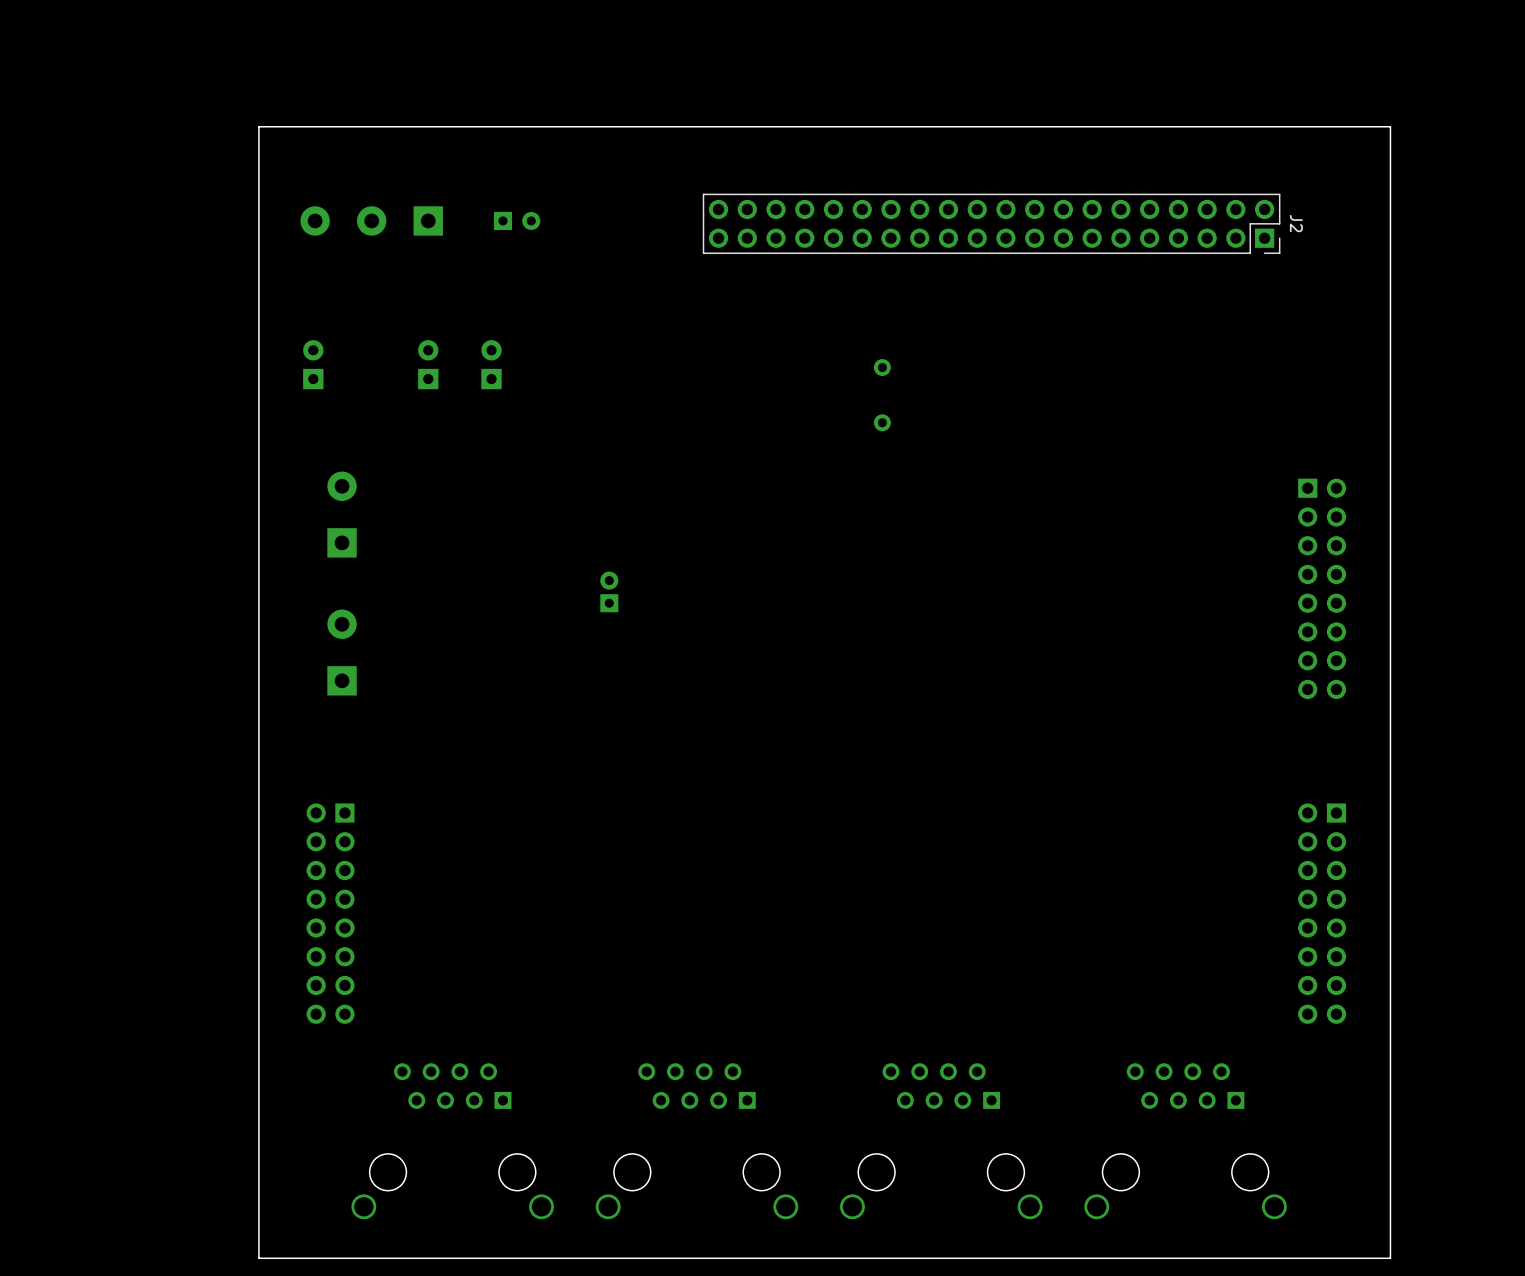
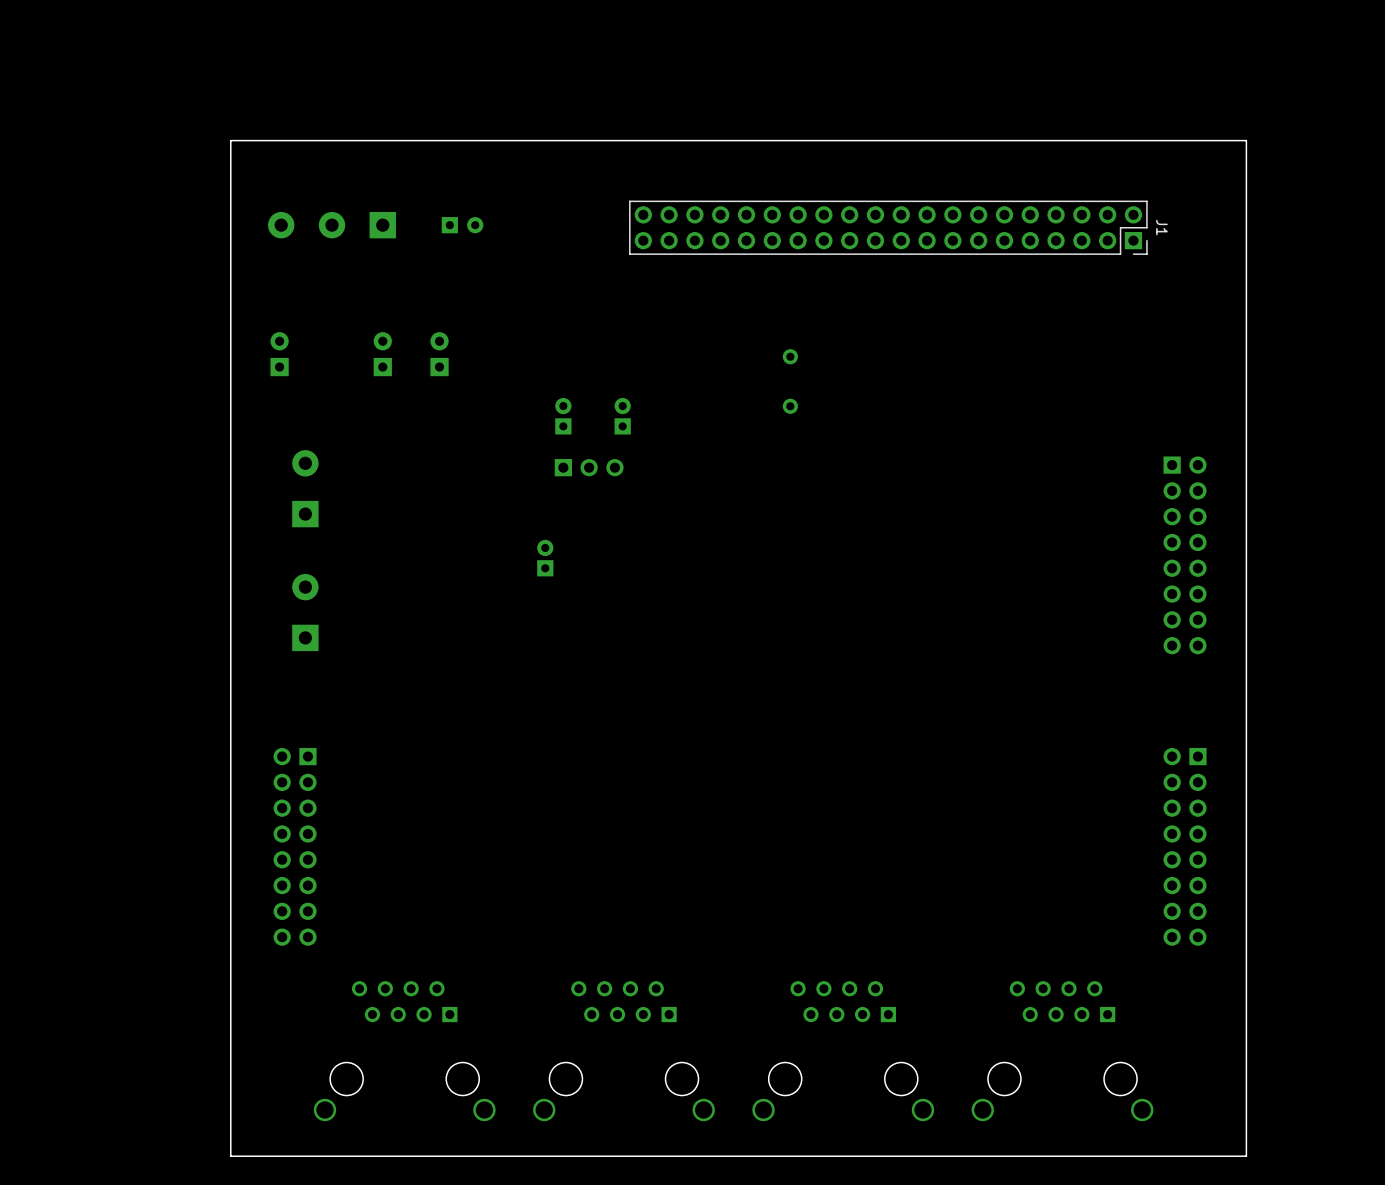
J2 name: J2 (1296, 223) -> J1 (1161, 227)
part: none -> (563, 416)
part: none -> (622, 416)
part: none -> (589, 467)

